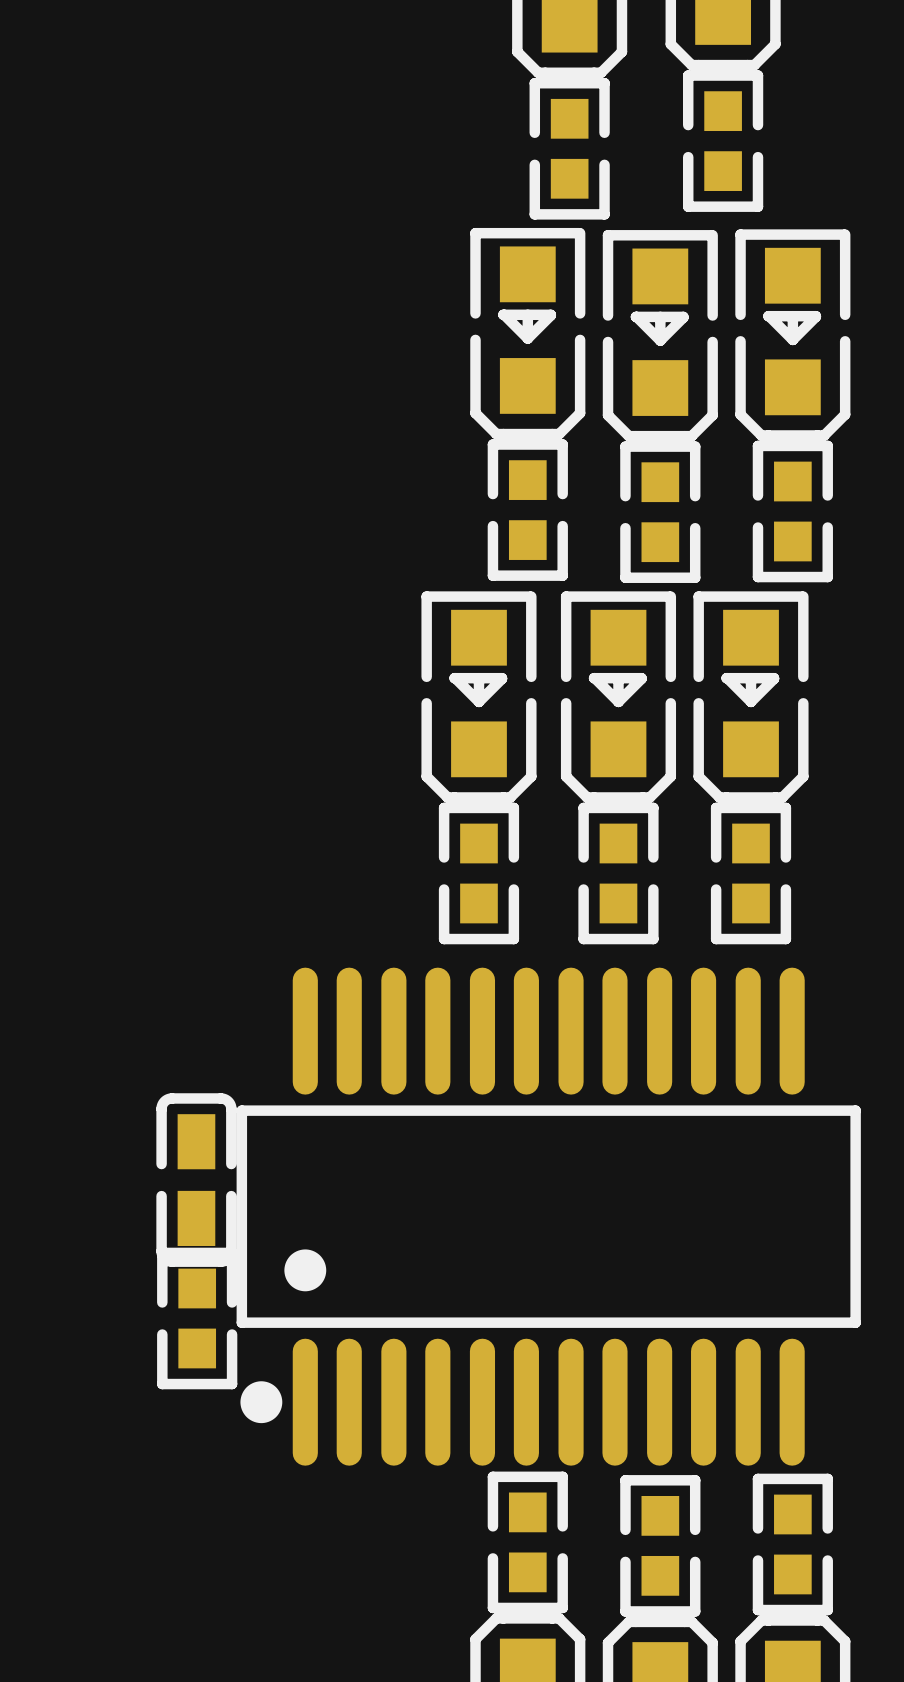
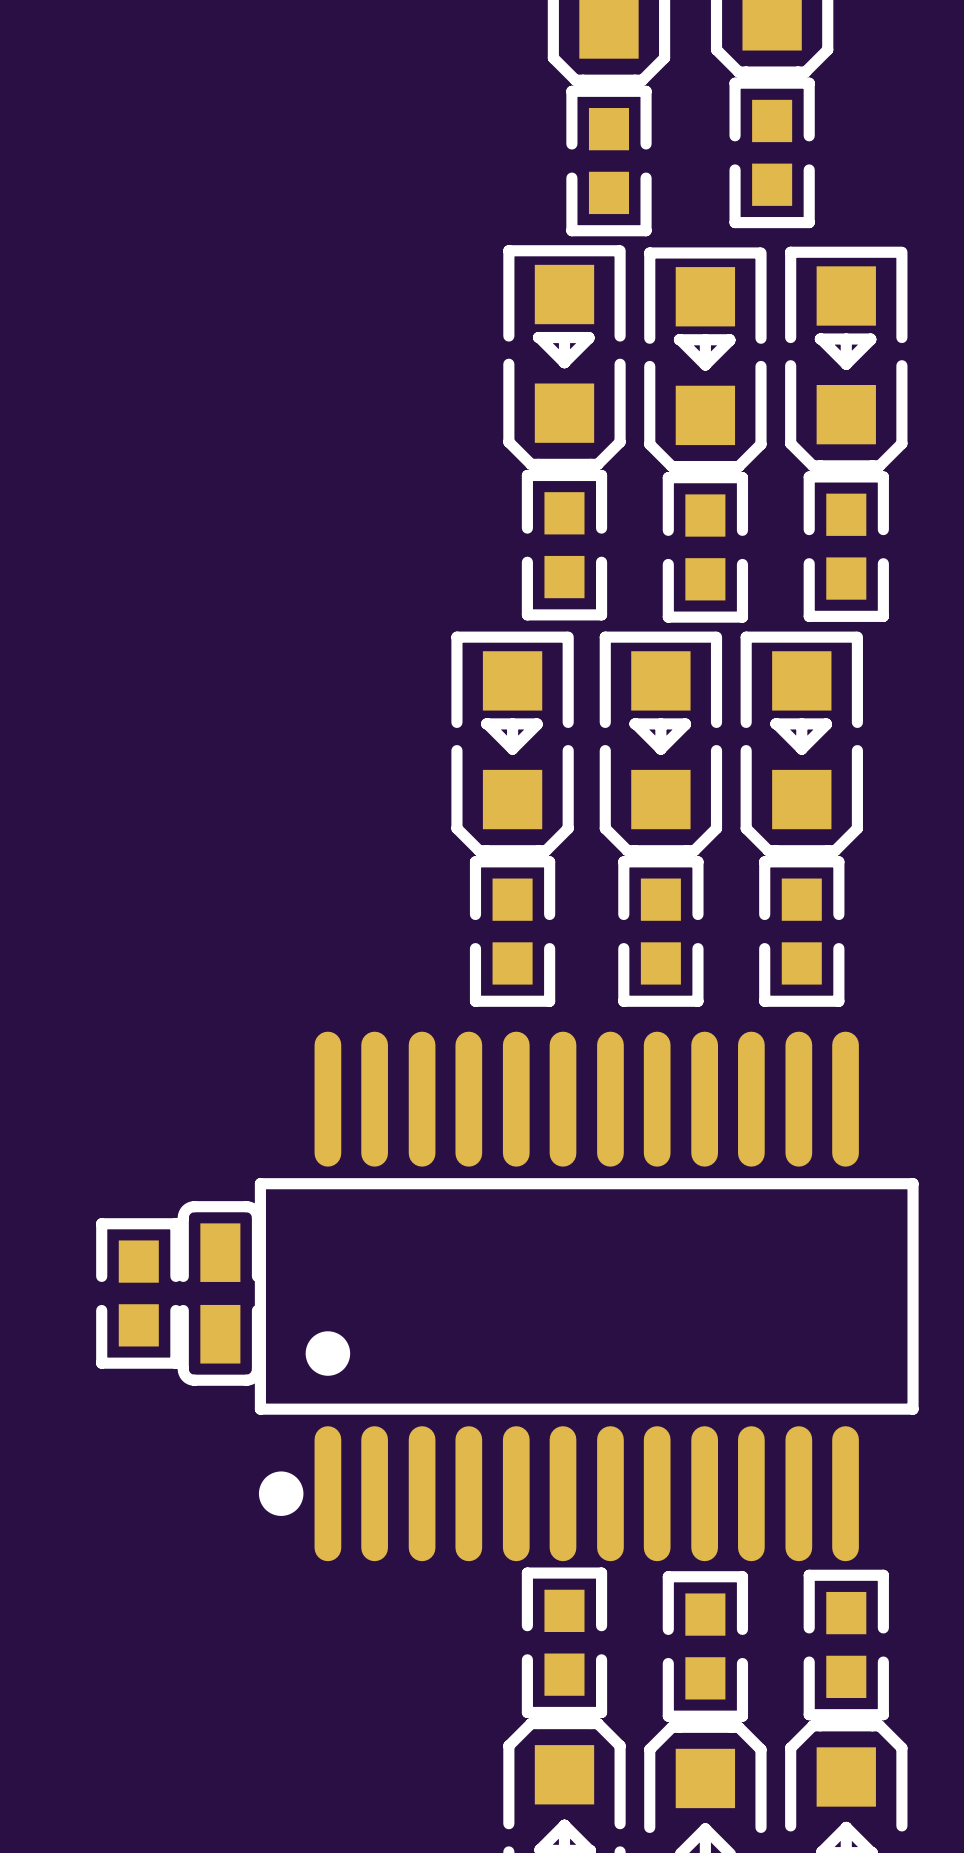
part position: (196, 1180) -> (220, 1293)
part position: (197, 1318) -> (138, 1293)

